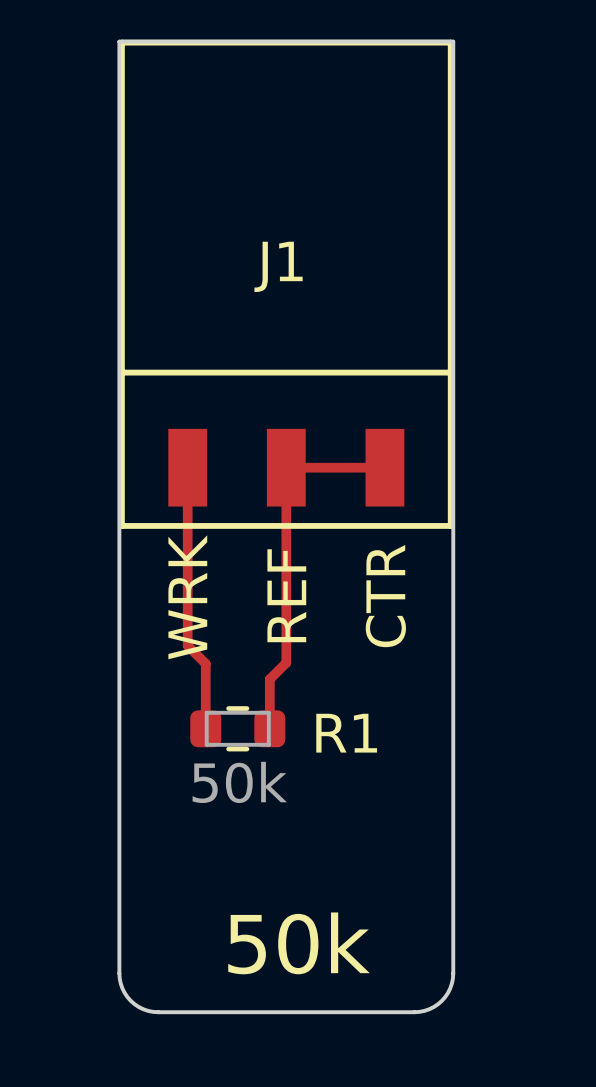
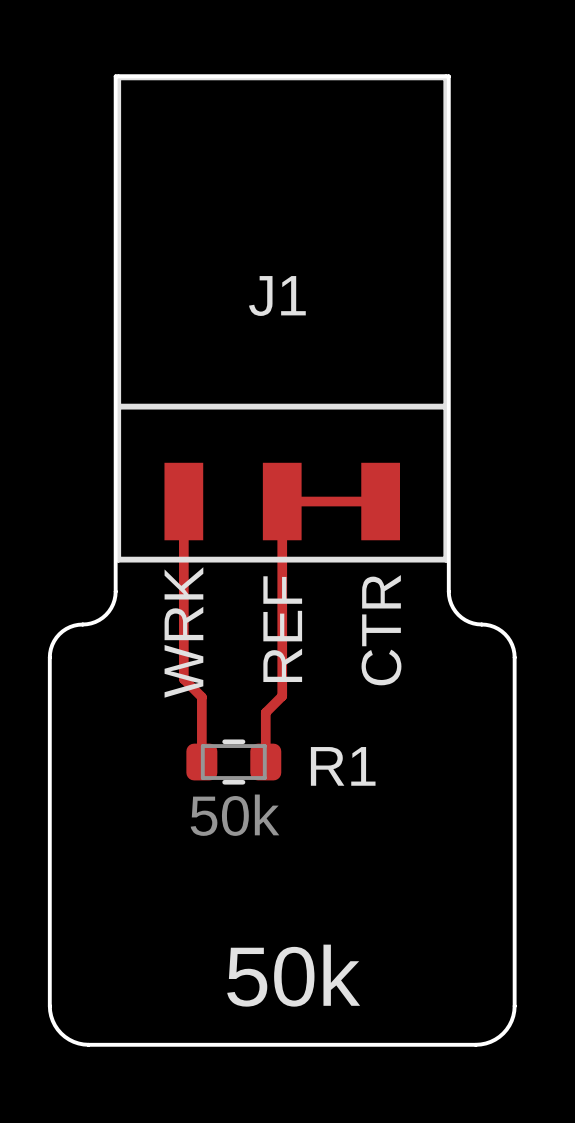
board edge: (119, 557) (119, 978) (124, 992) (130, 1000) (143, 1009) (158, 1012) -> (115, 591) (113, 604) (106, 614) (95, 622) (74, 625) (62, 631) (54, 640) (50, 653) (50, 1011) (55, 1025) (61, 1033) (78, 1043) (154, 1044)
board edge: (453, 557) (452, 978) (448, 992) (441, 1000) (429, 1009) (414, 1012) -> (448, 591) (451, 604) (458, 614) (469, 622) (490, 625) (501, 631) (510, 640) (514, 653) (514, 1011) (509, 1025) (503, 1033) (485, 1043) (410, 1044)

